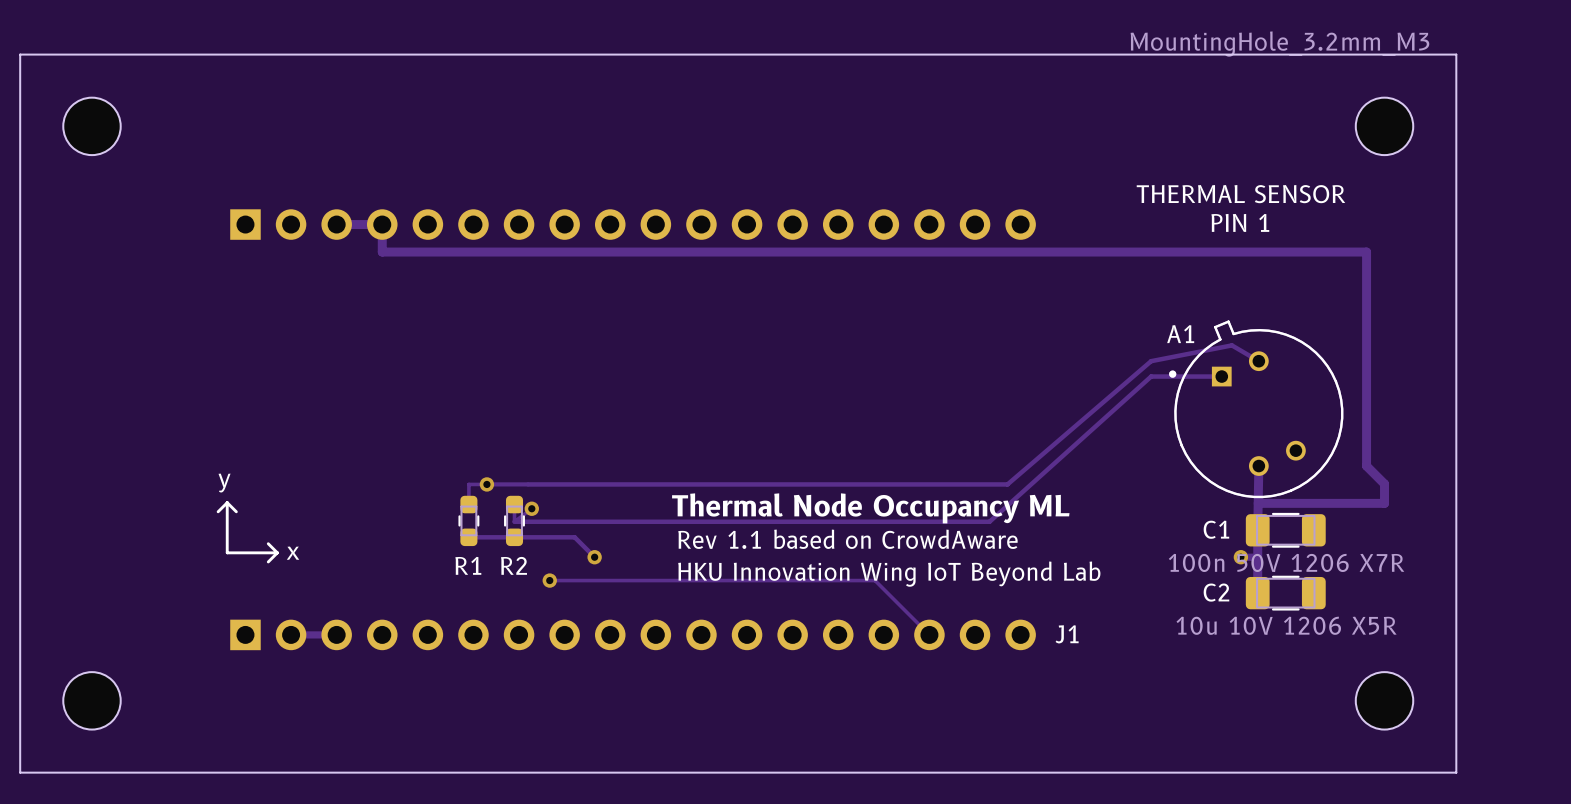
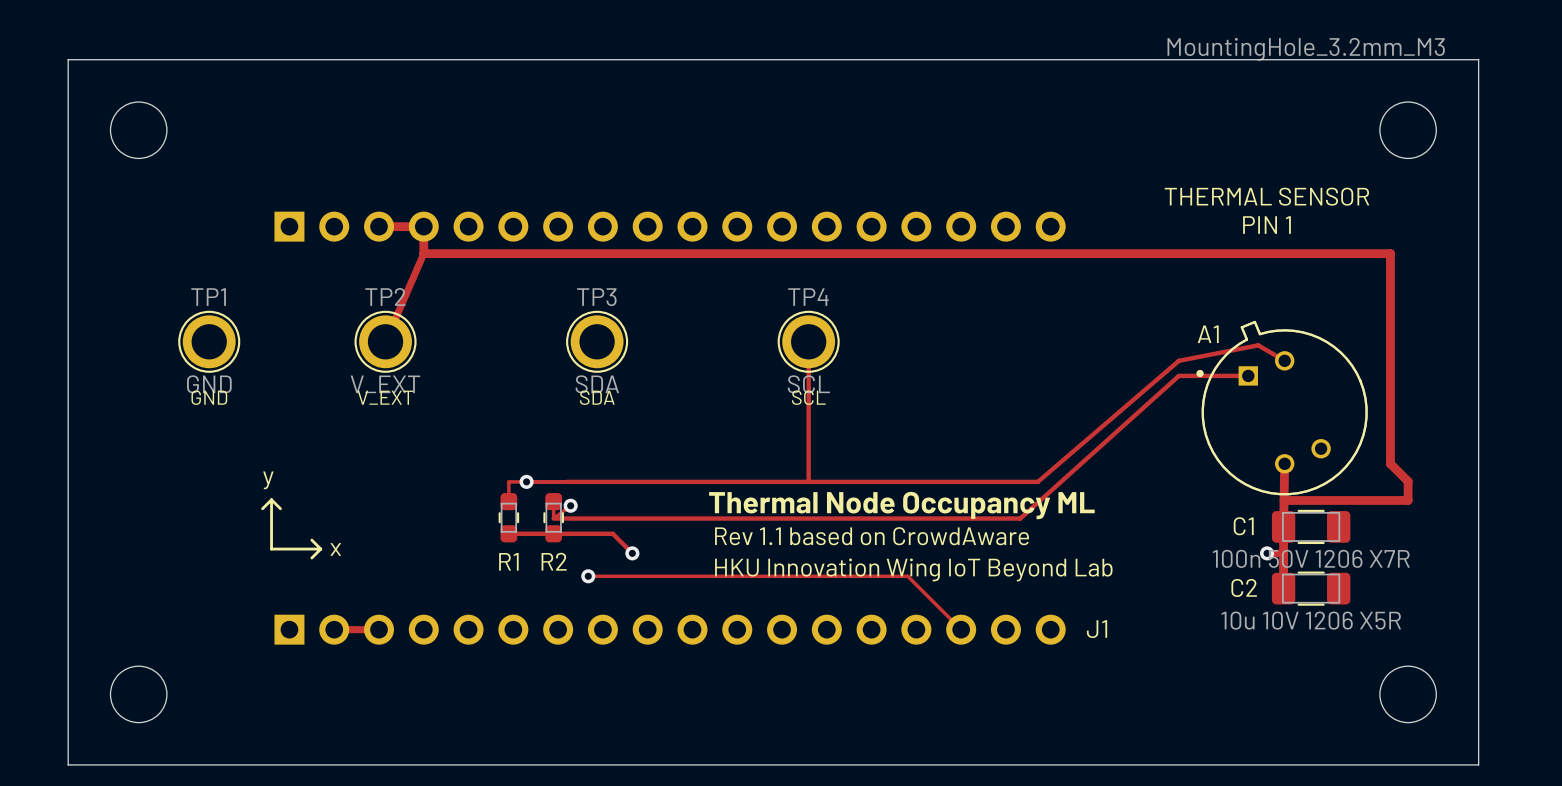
track: none -> (423, 253) (385, 341)
TP1: none -> GND (209, 341)
TP2: none -> V_EXT (385, 341)
TP3: none -> SDA (597, 341)
track: none -> (808, 341) (808, 481)
TP4: none -> SCL (808, 341)
text: none -> GND (209, 397)
text: none -> SDA (597, 397)
text: none -> SCL (808, 397)
text: none -> V_EXT (385, 397)

